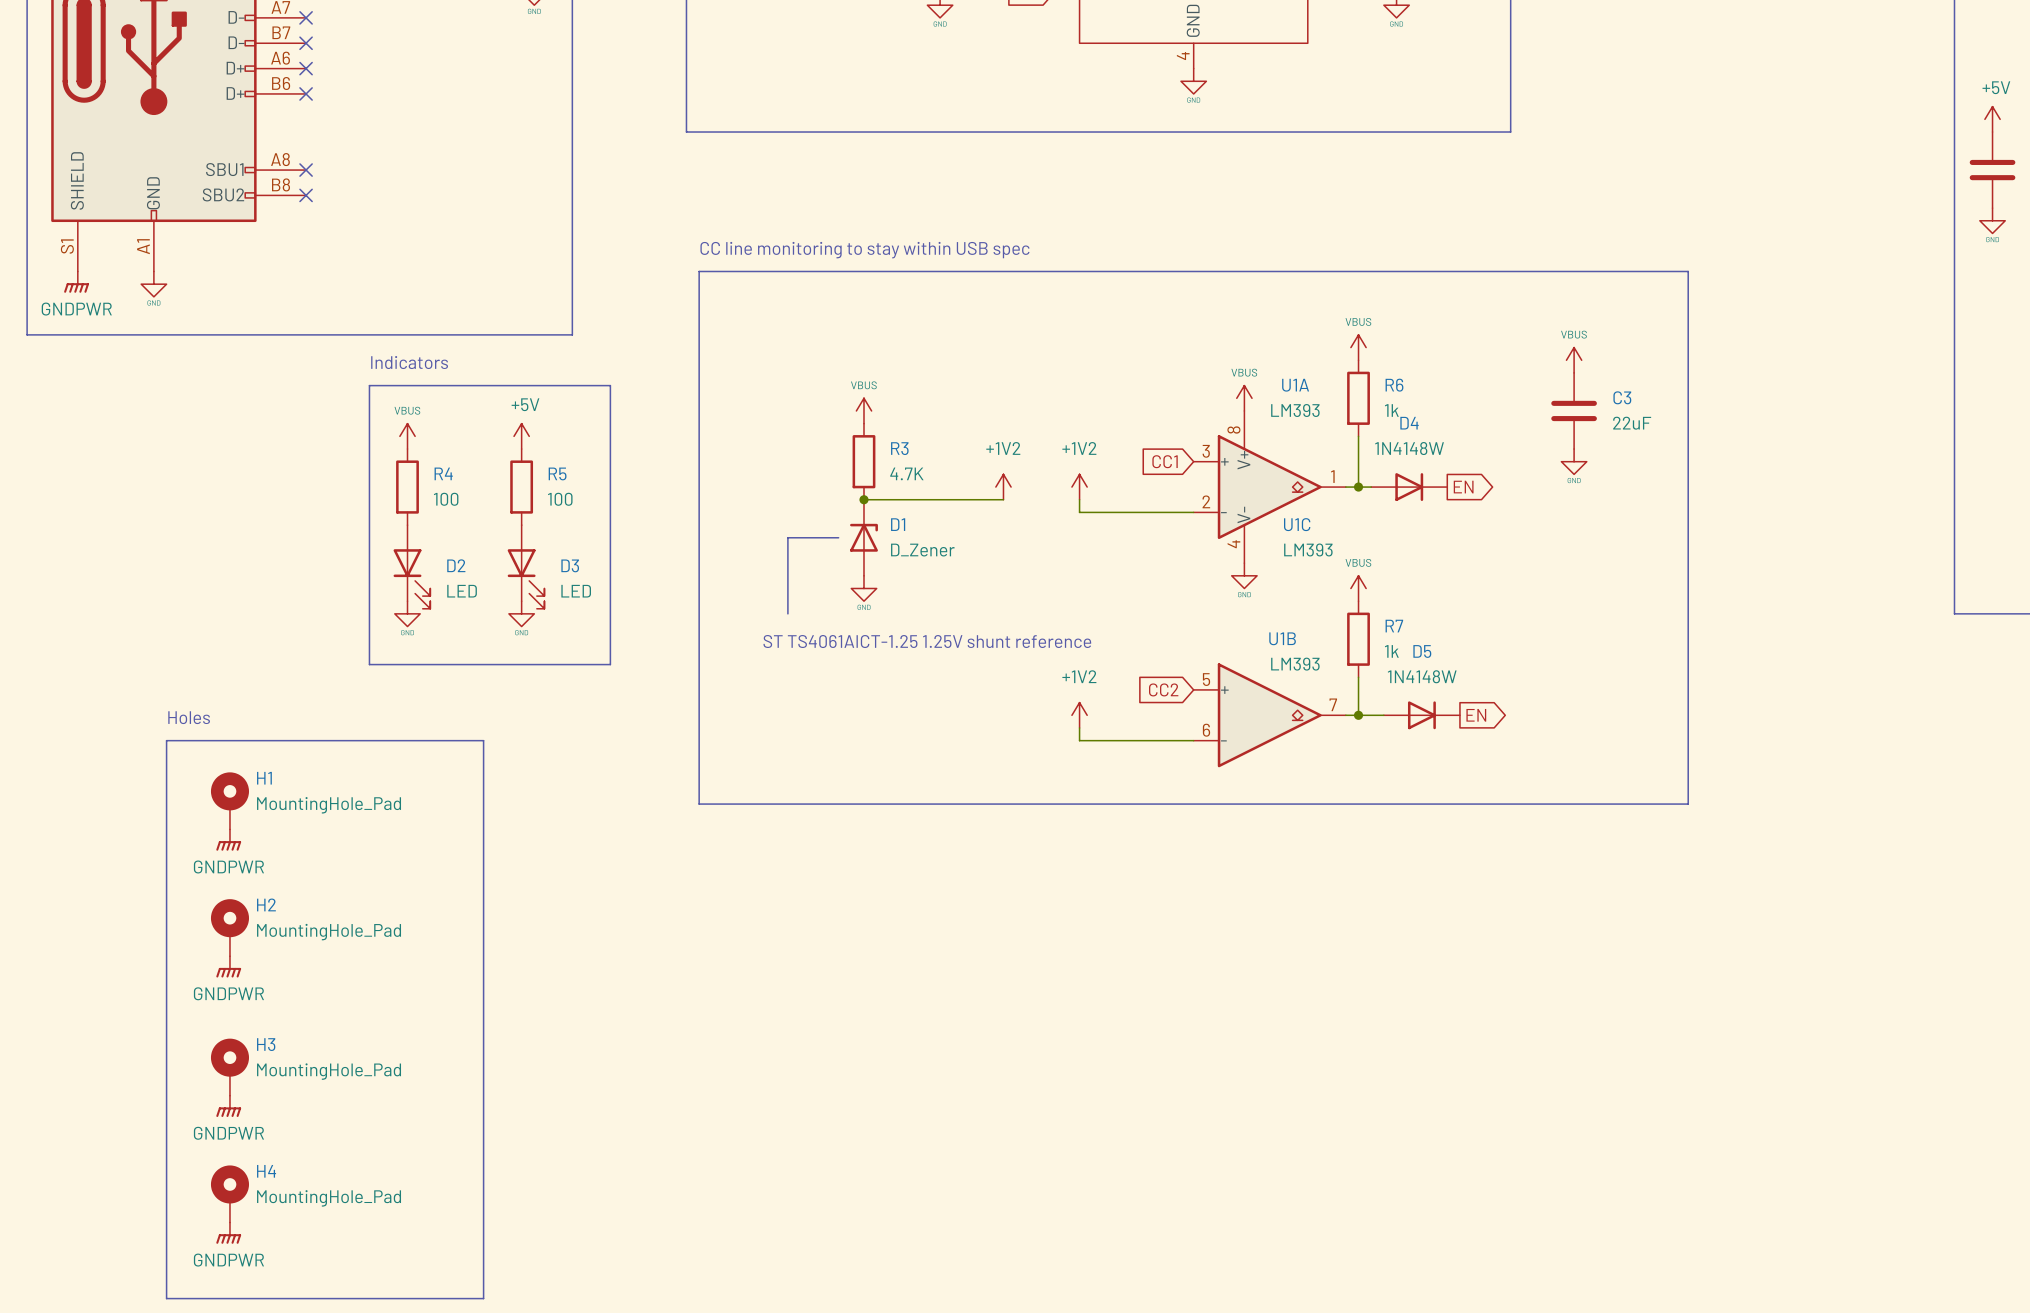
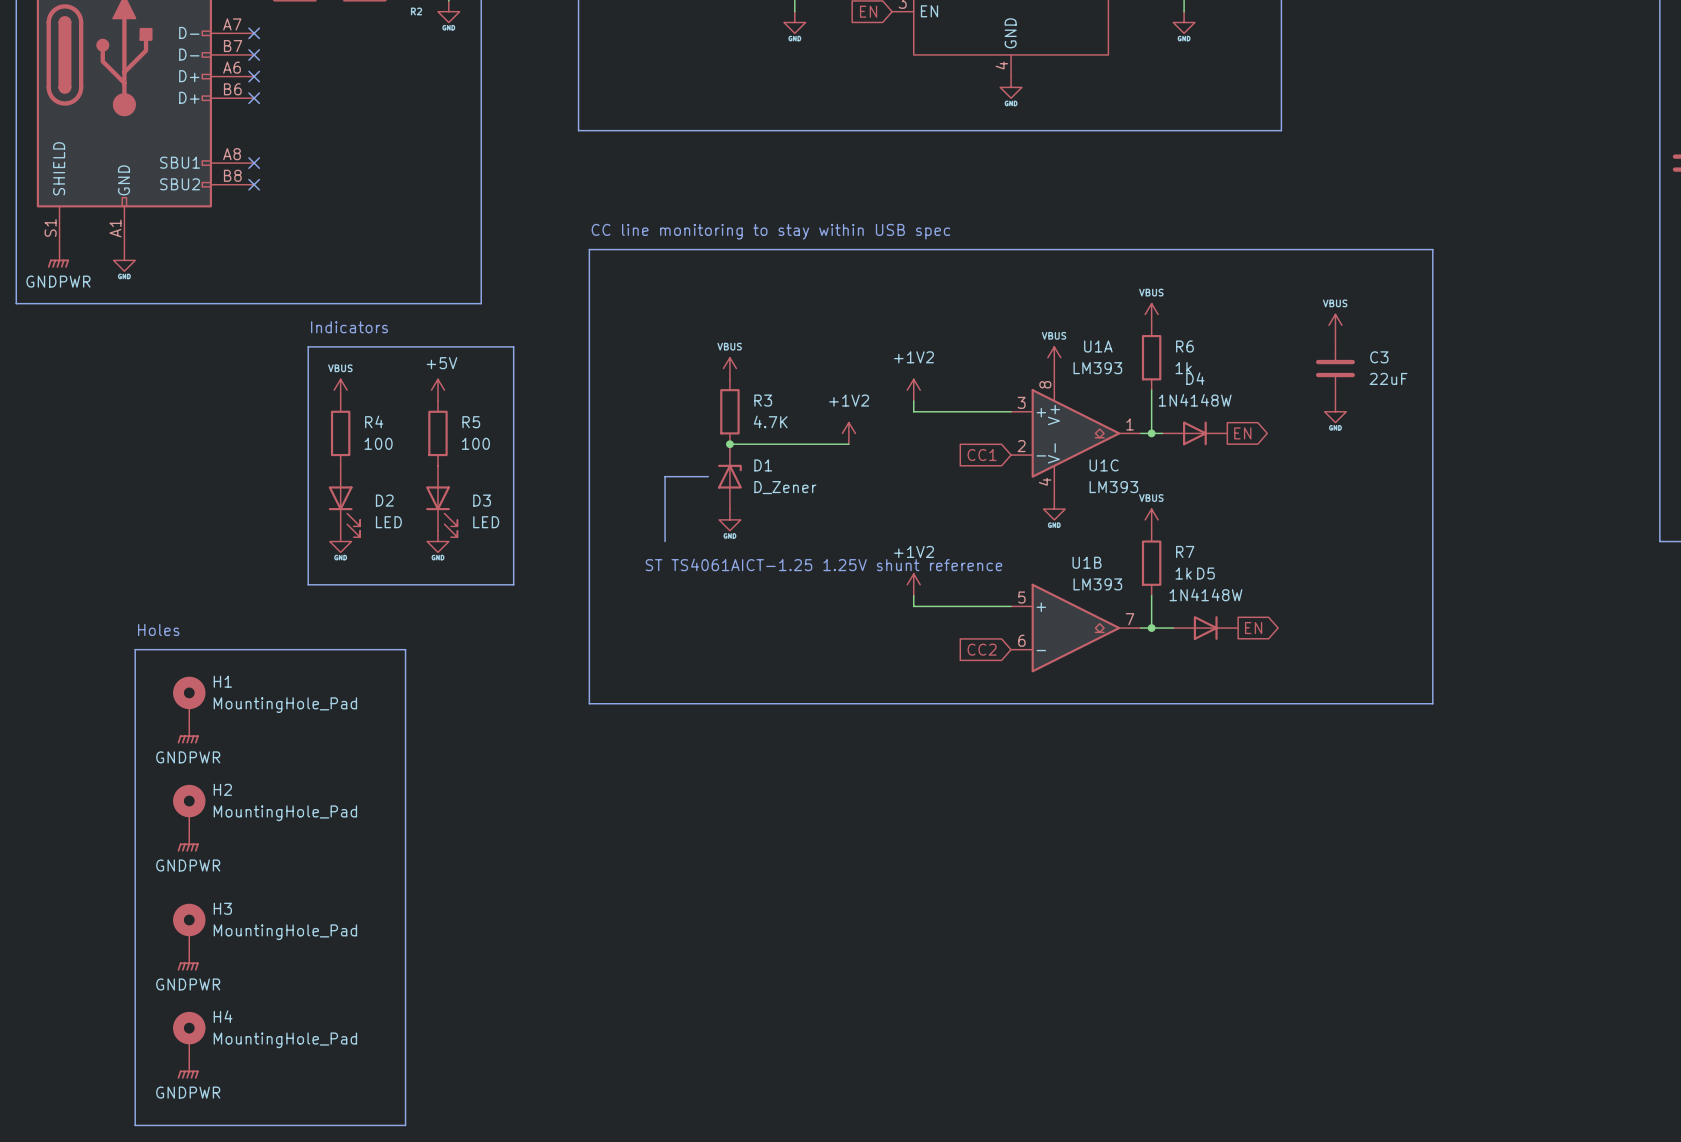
global label position: CC1 (1165, 461) -> CC1 (982, 455)
power symbol position: +1V2 (1079, 487) -> +1V2 (913, 390)
wire: (1079, 499) (1079, 512) (1193, 512) -> (913, 400) (913, 411) (1011, 411)
global label position: CC2 (1163, 689) -> CC2 (982, 649)
power symbol position: +1V2 (1079, 715) -> +1V2 (913, 584)
wire: (1079, 727) (1079, 740) (1193, 740) -> (913, 595) (913, 606) (1011, 606)

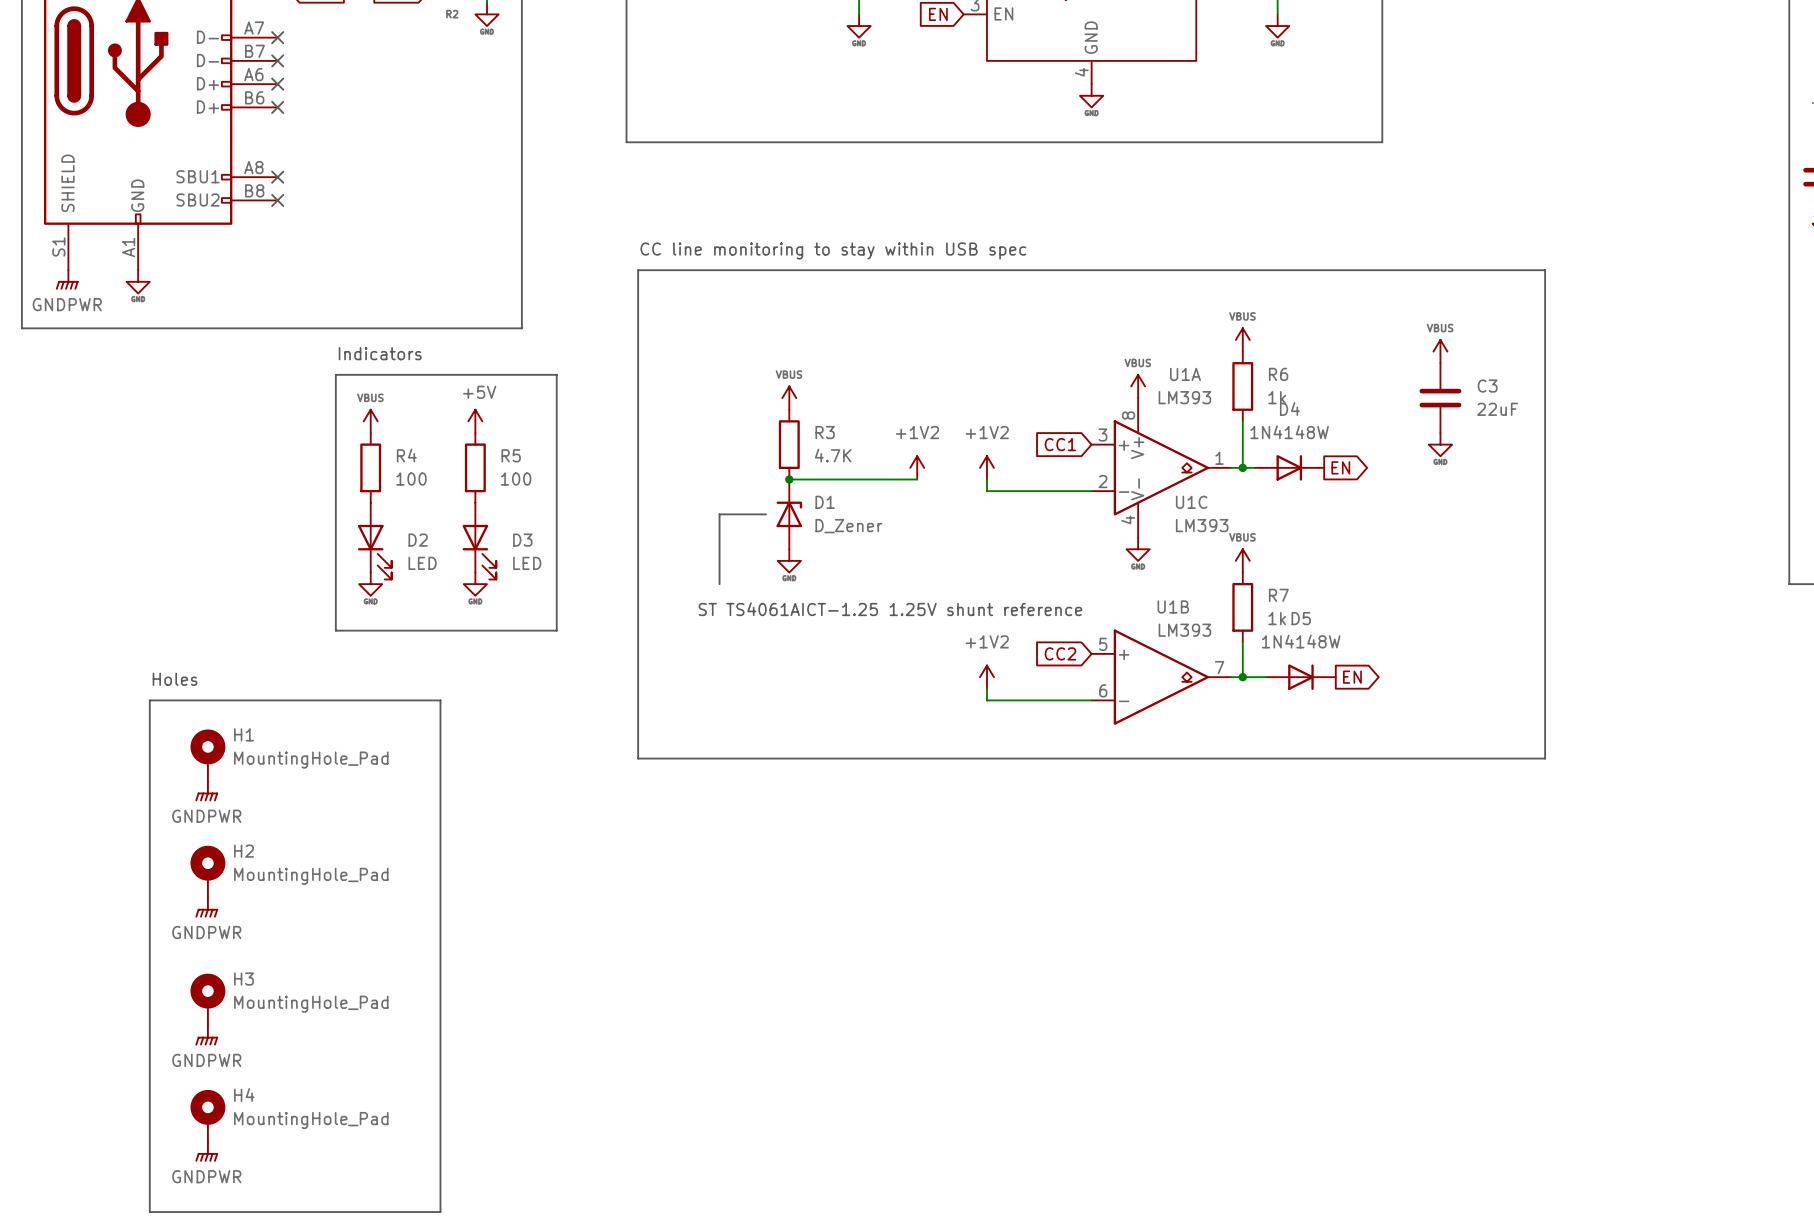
power symbol position: +1V2 (913, 390) -> +1V2 (986, 467)
wire: (913, 400) (913, 411) (1011, 411) -> (986, 479) (986, 491) (1091, 491)
global label position: CC1 (982, 455) -> CC1 (1060, 444)
power symbol position: +1V2 (913, 584) -> +1V2 (986, 677)
wire: (913, 595) (913, 606) (1011, 606) -> (986, 688) (986, 700) (1091, 700)
global label position: CC2 (982, 649) -> CC2 (1060, 653)

